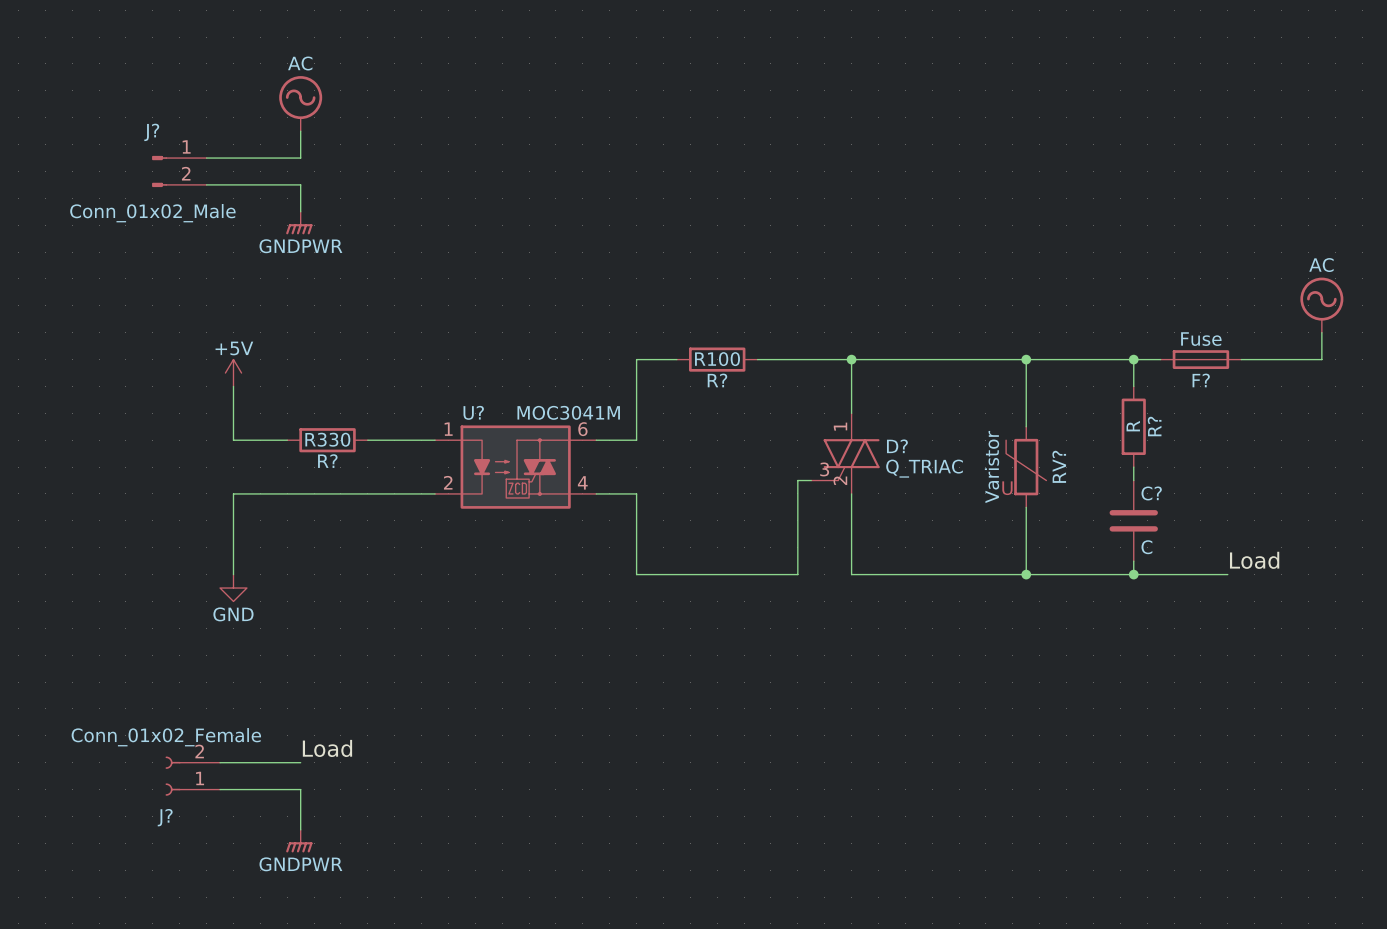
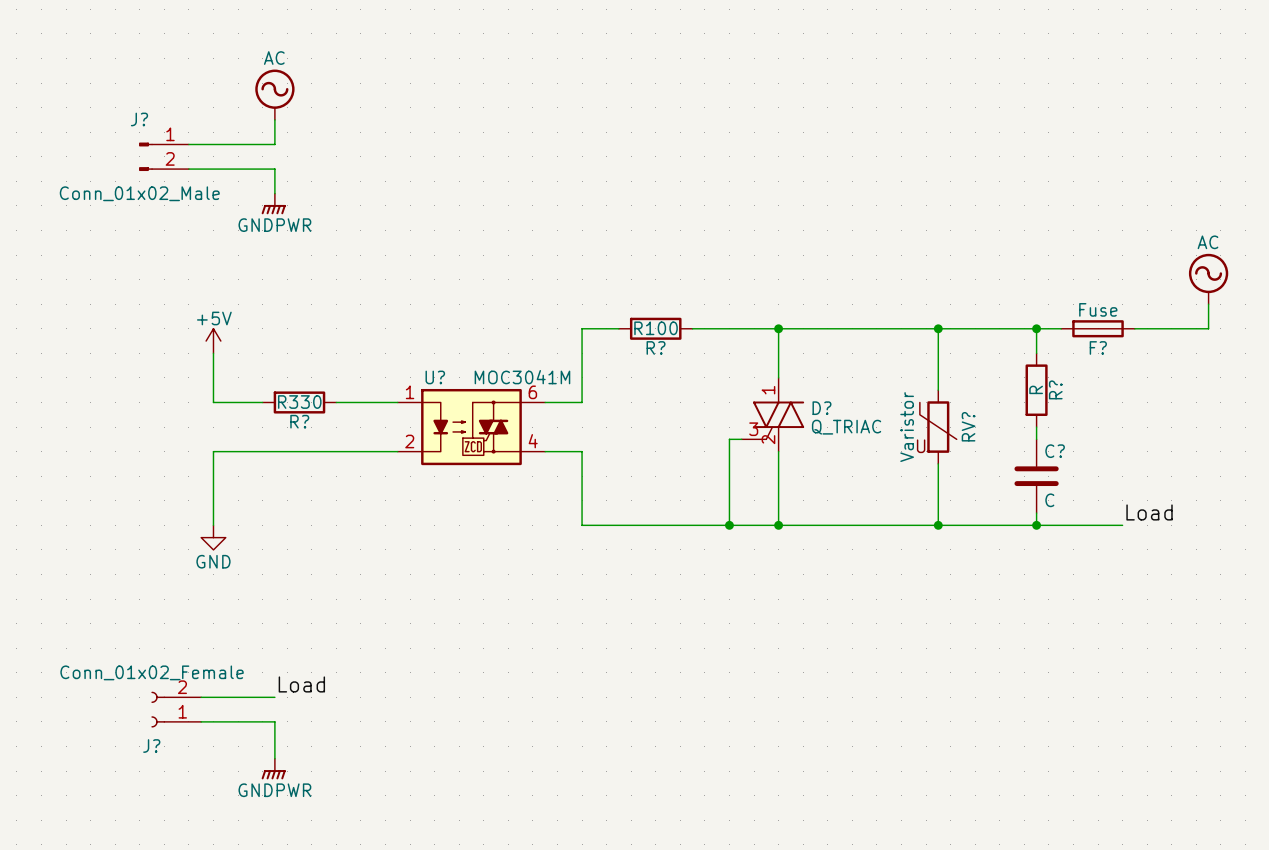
wire: none -> (729, 525) (778, 525)
junction: none -> (729, 525)
junction: none -> (778, 525)

